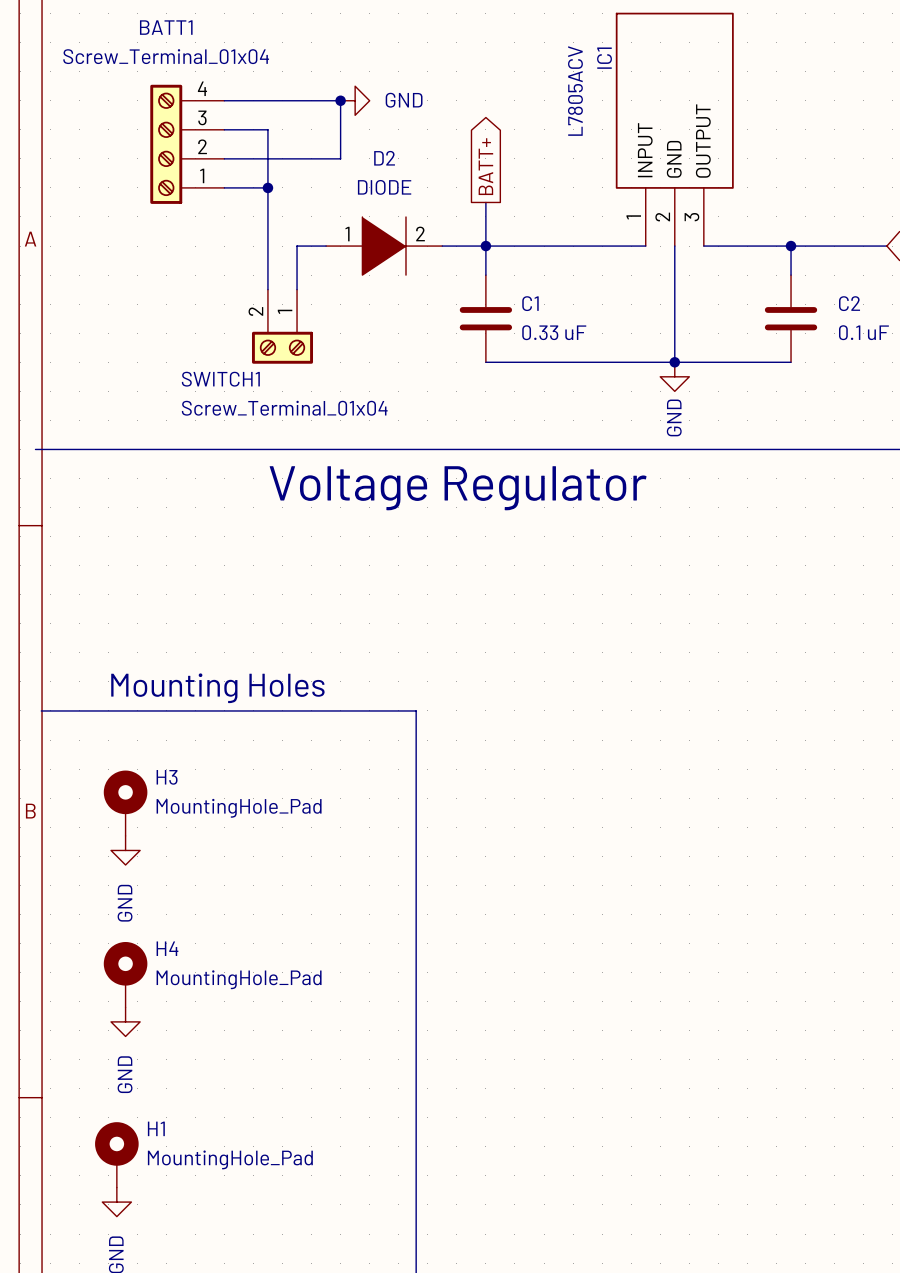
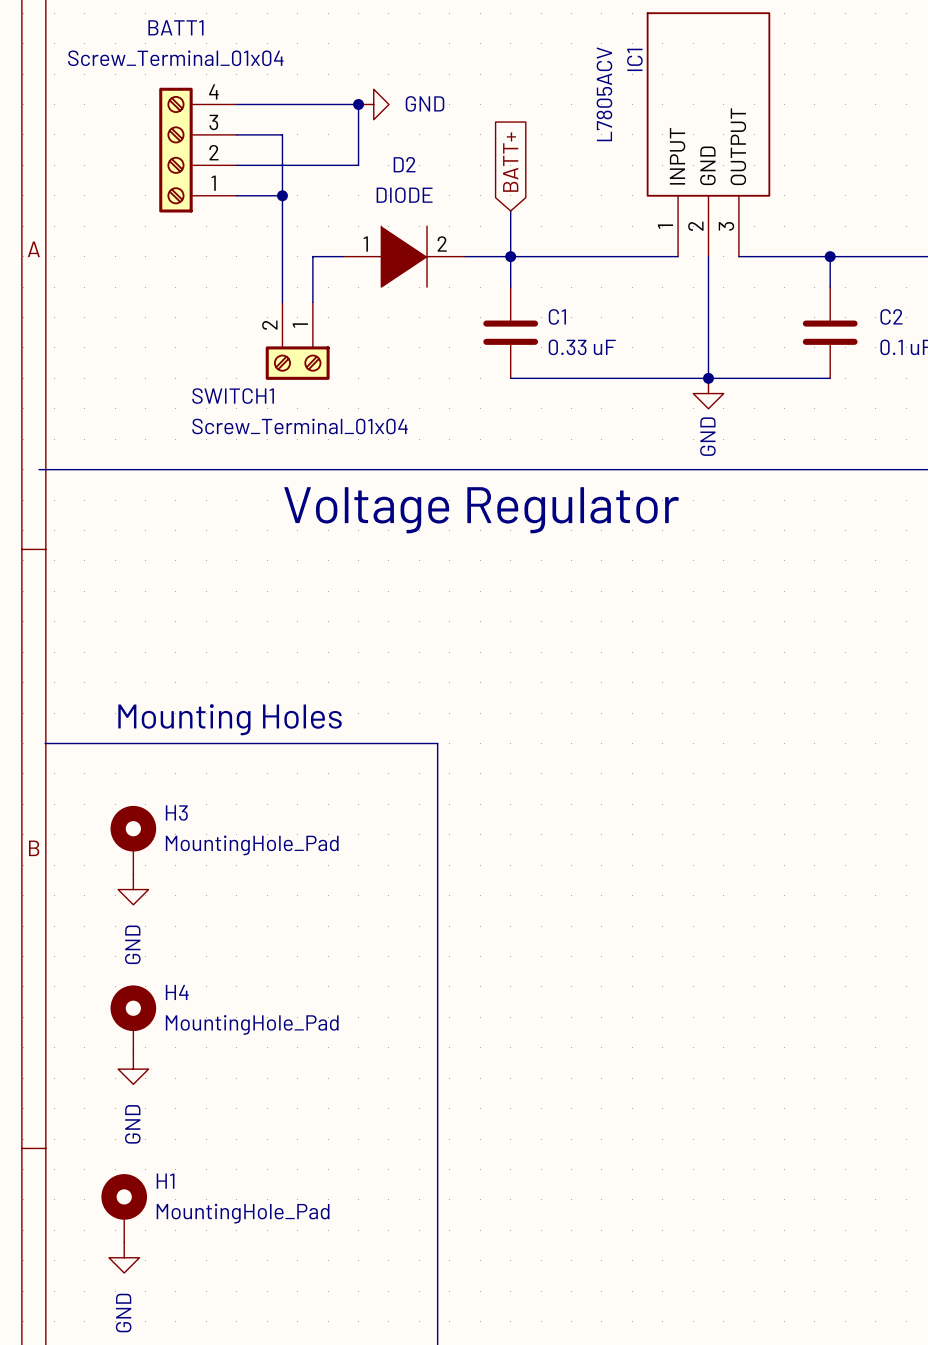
global label shape: output (485, 166) -> input (510, 162)

